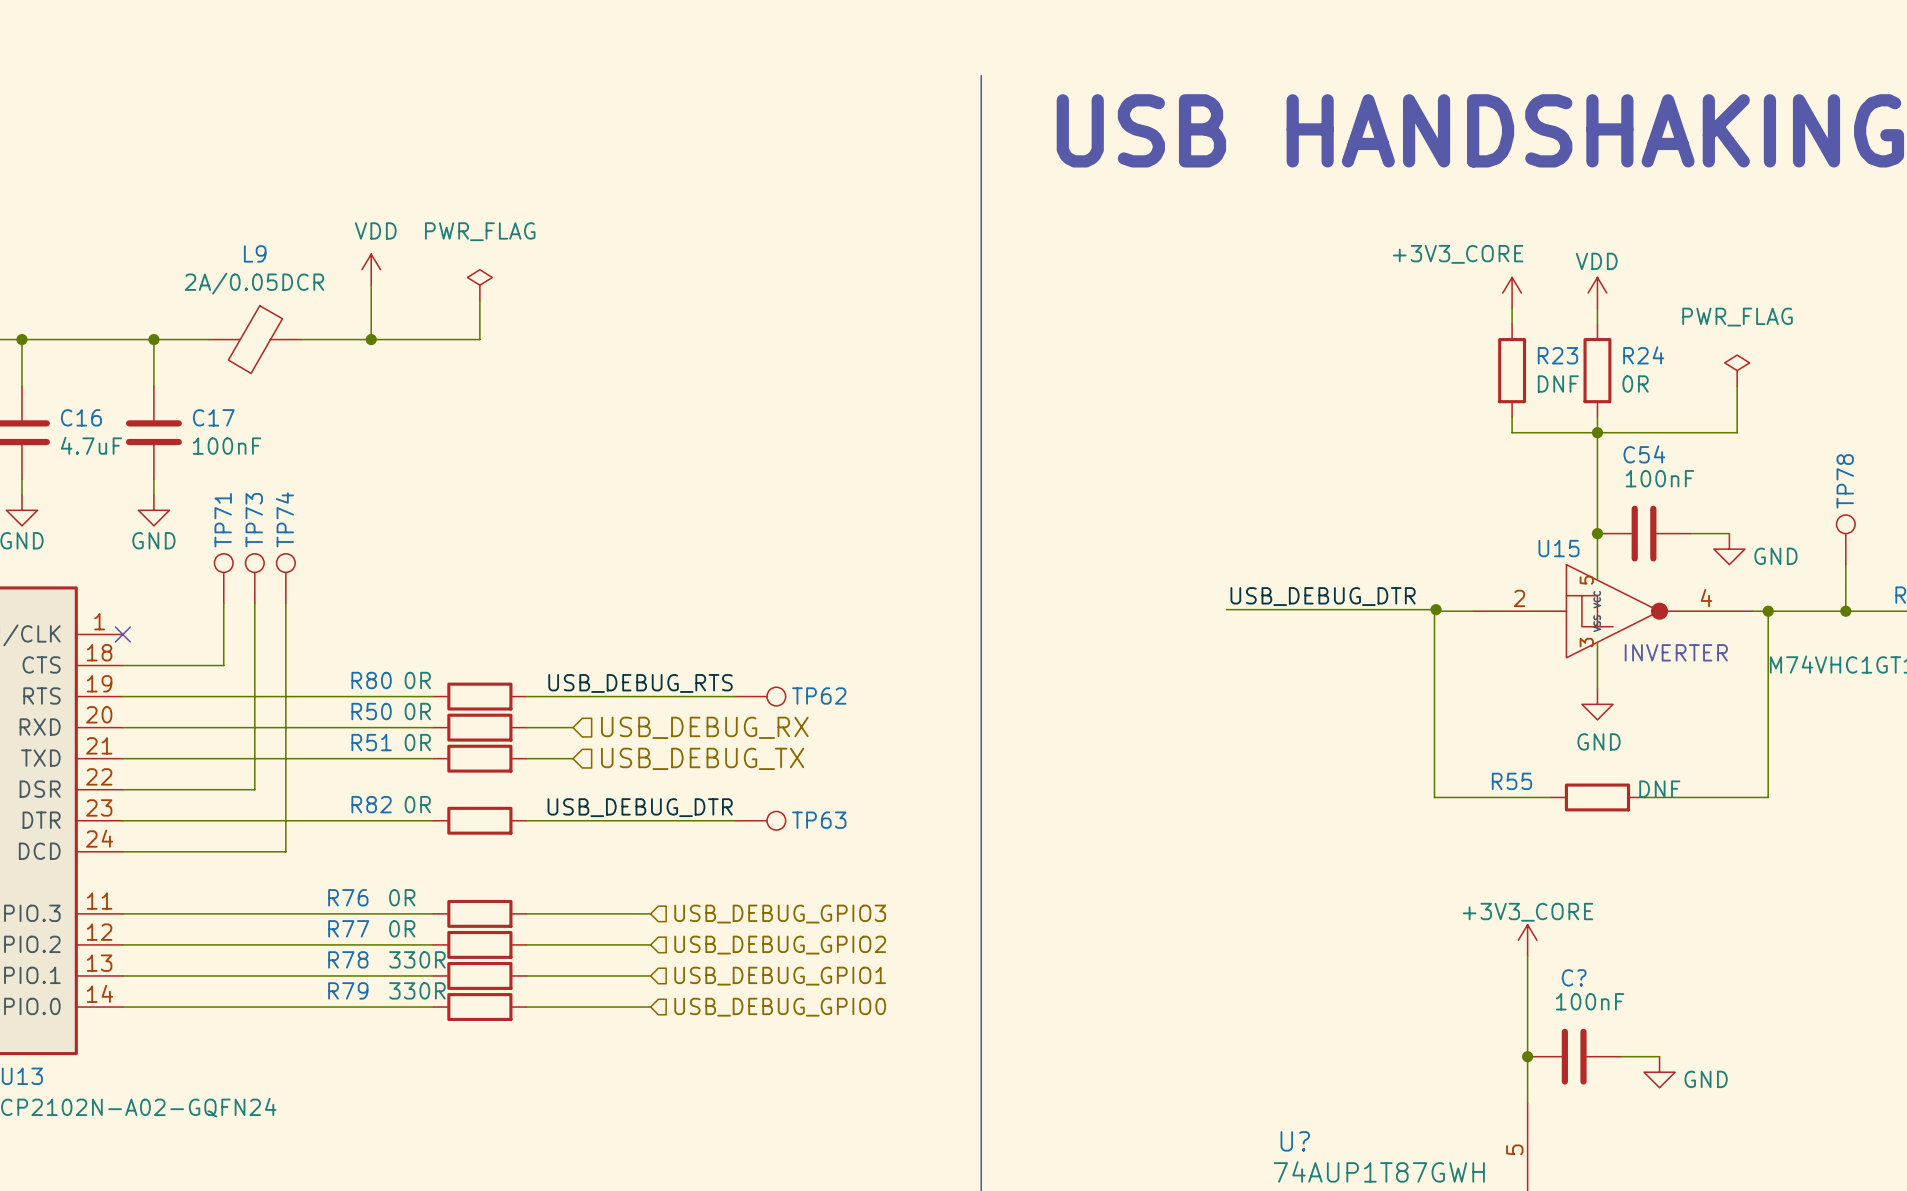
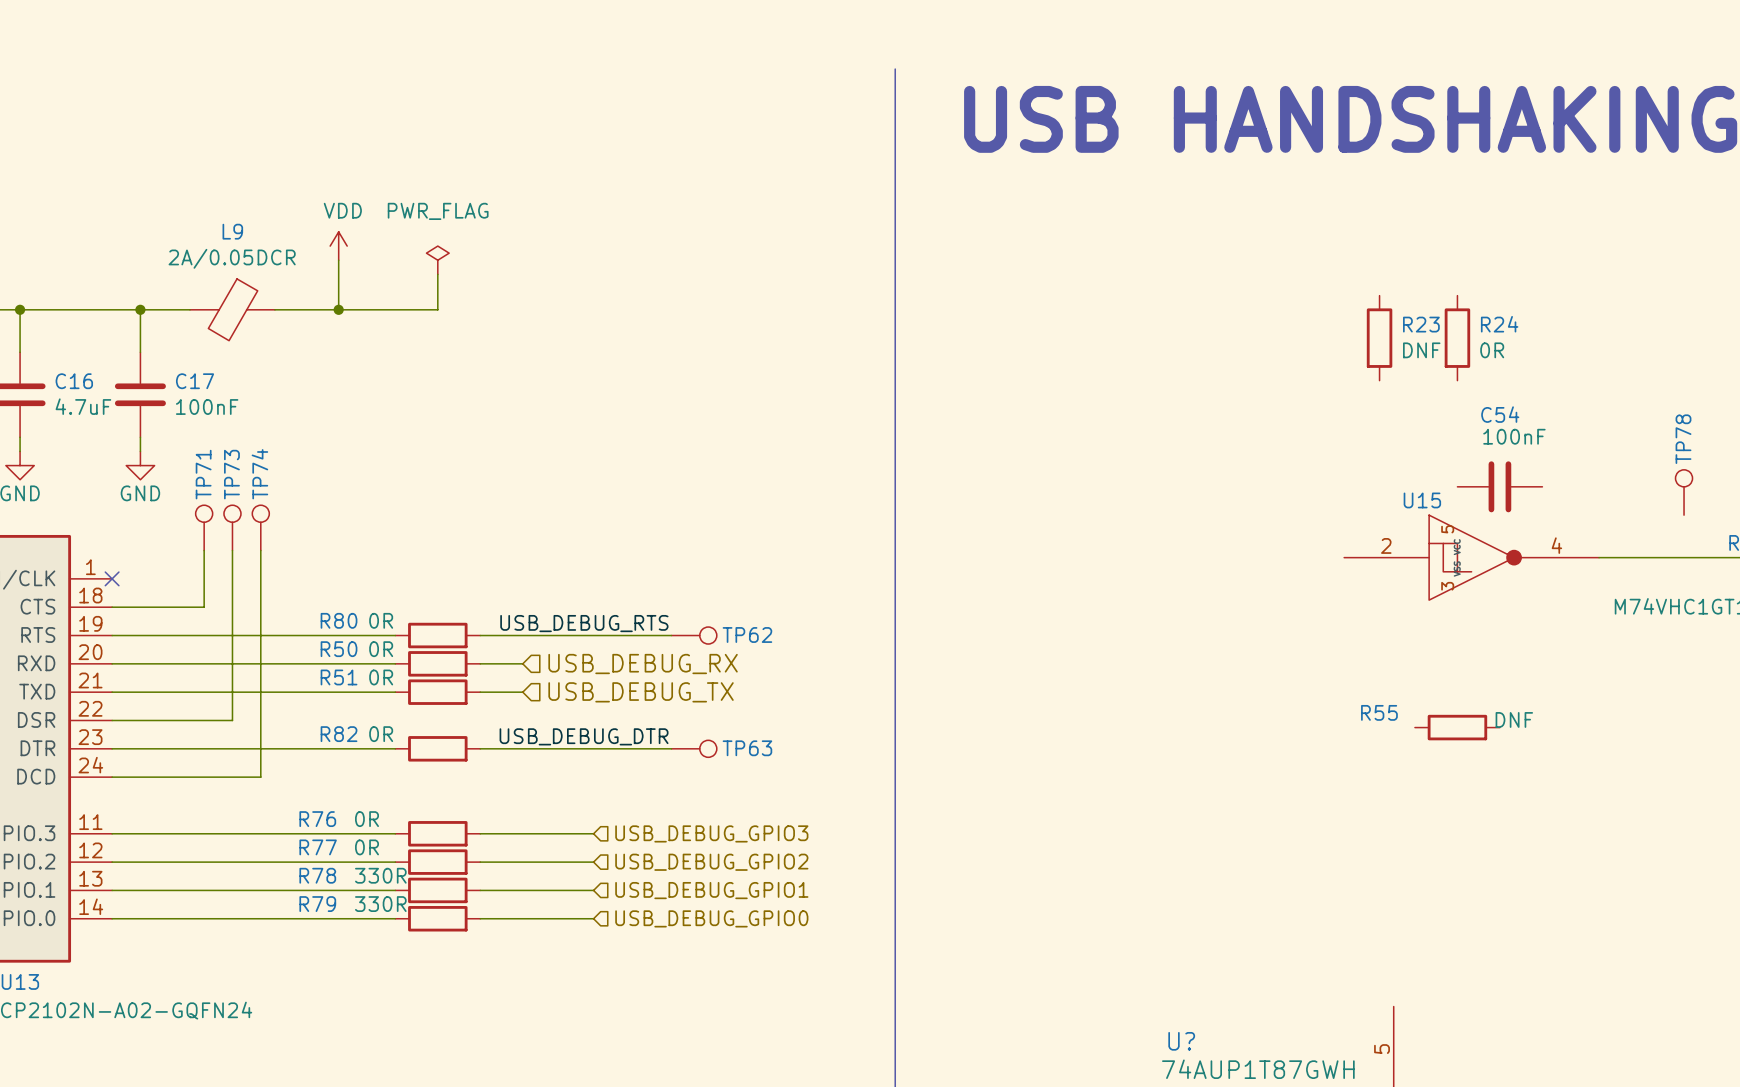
power symbol: +3V3_CORE (1512, 293) -> none
power symbol: VDD (1597, 293) -> none
wire: (1512, 308) (1512, 324) -> none
wire: (1597, 308) (1597, 324) -> none
power symbol: PWR_FLAG (1737, 370) -> none
wire: (1737, 386) (1737, 432) (1512, 432) (1512, 417) -> none
wire: (1597, 417) (1597, 580) -> none
junction: (1597, 432) -> none
junction: (1597, 533) -> none
wire: (1690, 533) (1729, 533) -> none
power symbol: GND (1729, 549) -> none
wire: (1845, 564) (1845, 611) -> none
label: USB_DEBUG_DTR (1323, 596) -> none
wire: (1226, 609) (1436, 609) -> none
junction: (1436, 609) -> none
wire: (1473, 611) (1434, 611) (1434, 797) (1550, 797) -> none
wire: (1768, 611) (1768, 797) (1644, 797) -> none
junction: (1768, 611) -> none
junction: (1845, 611) -> none
wire: (1597, 642) (1597, 688) -> none
text: INVERTER (1676, 652) -> none
power symbol: GND (1597, 704) -> none
power symbol: +3V3_CORE (1527, 940) -> none
wire: (1527, 955) (1527, 1103) -> none
junction: (1527, 1056) -> none
C?: 100nF (1574, 1056) -> none
wire: (1620, 1056) (1659, 1056) -> none
power symbol: GND (1659, 1072) -> none

